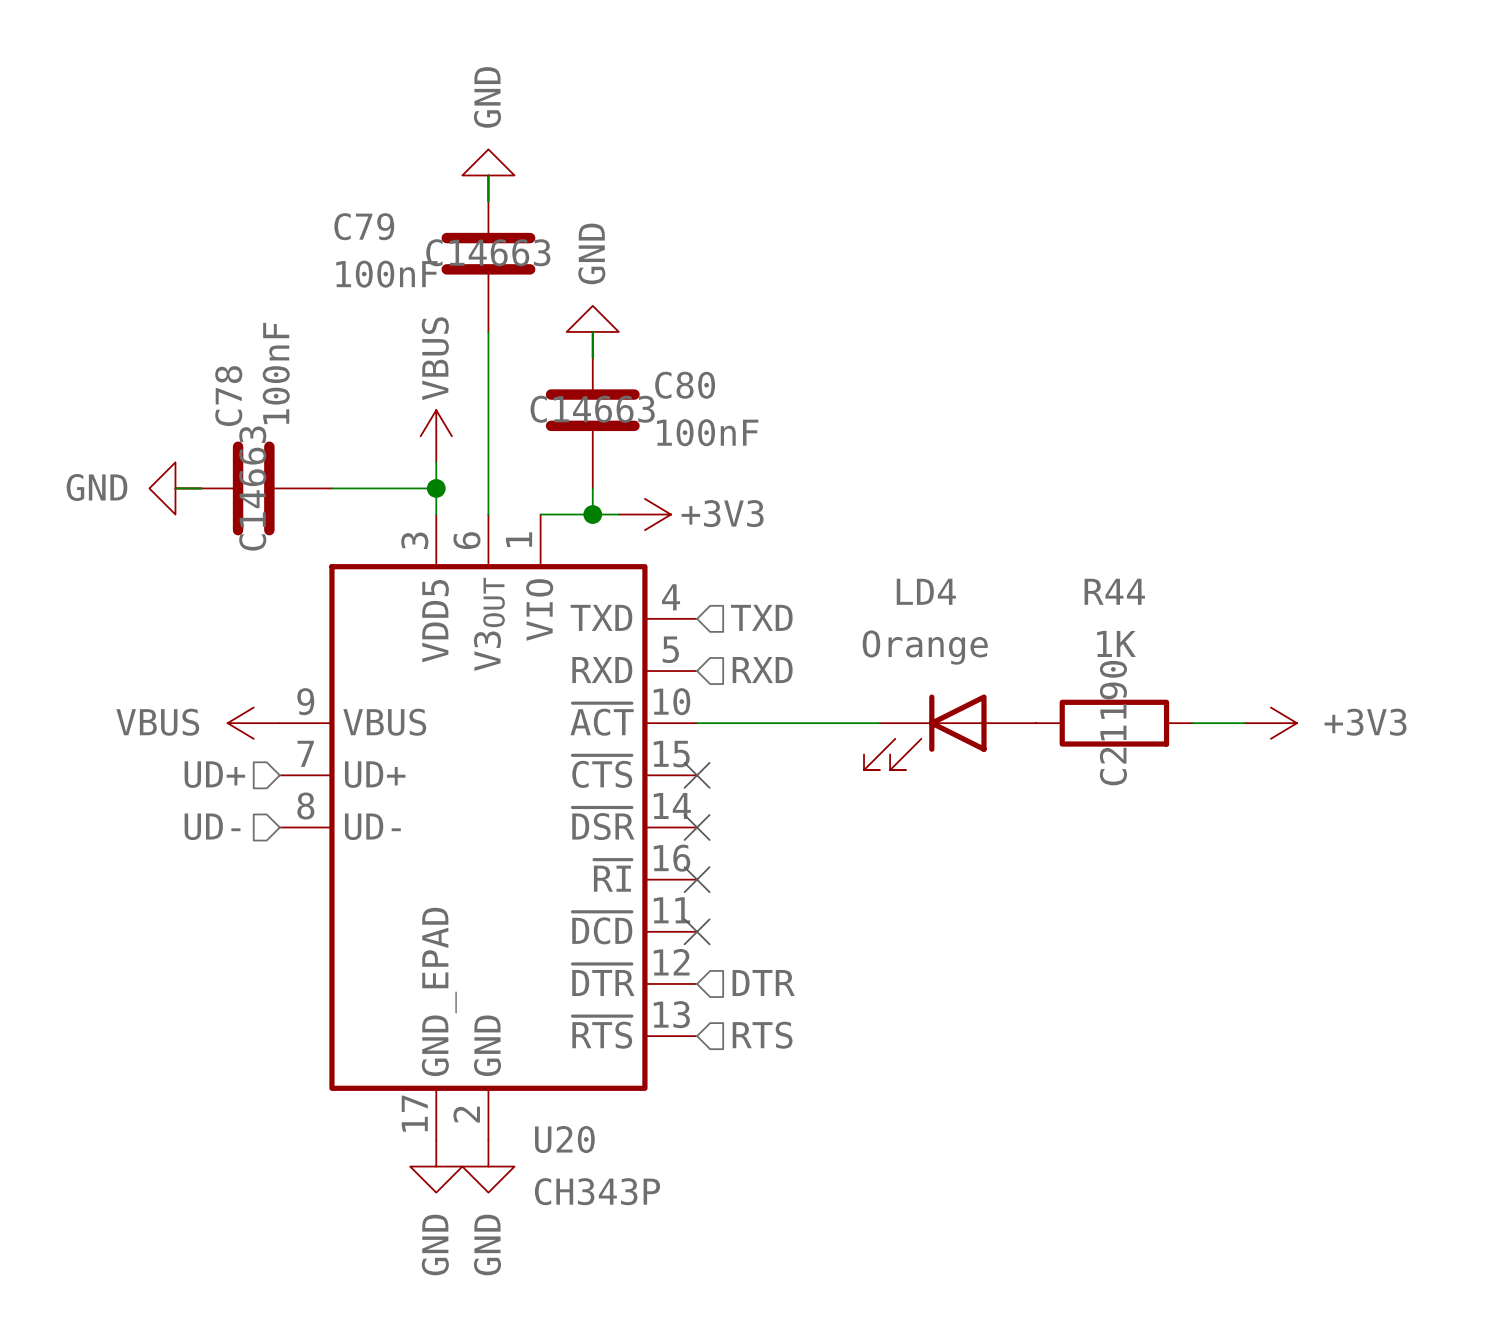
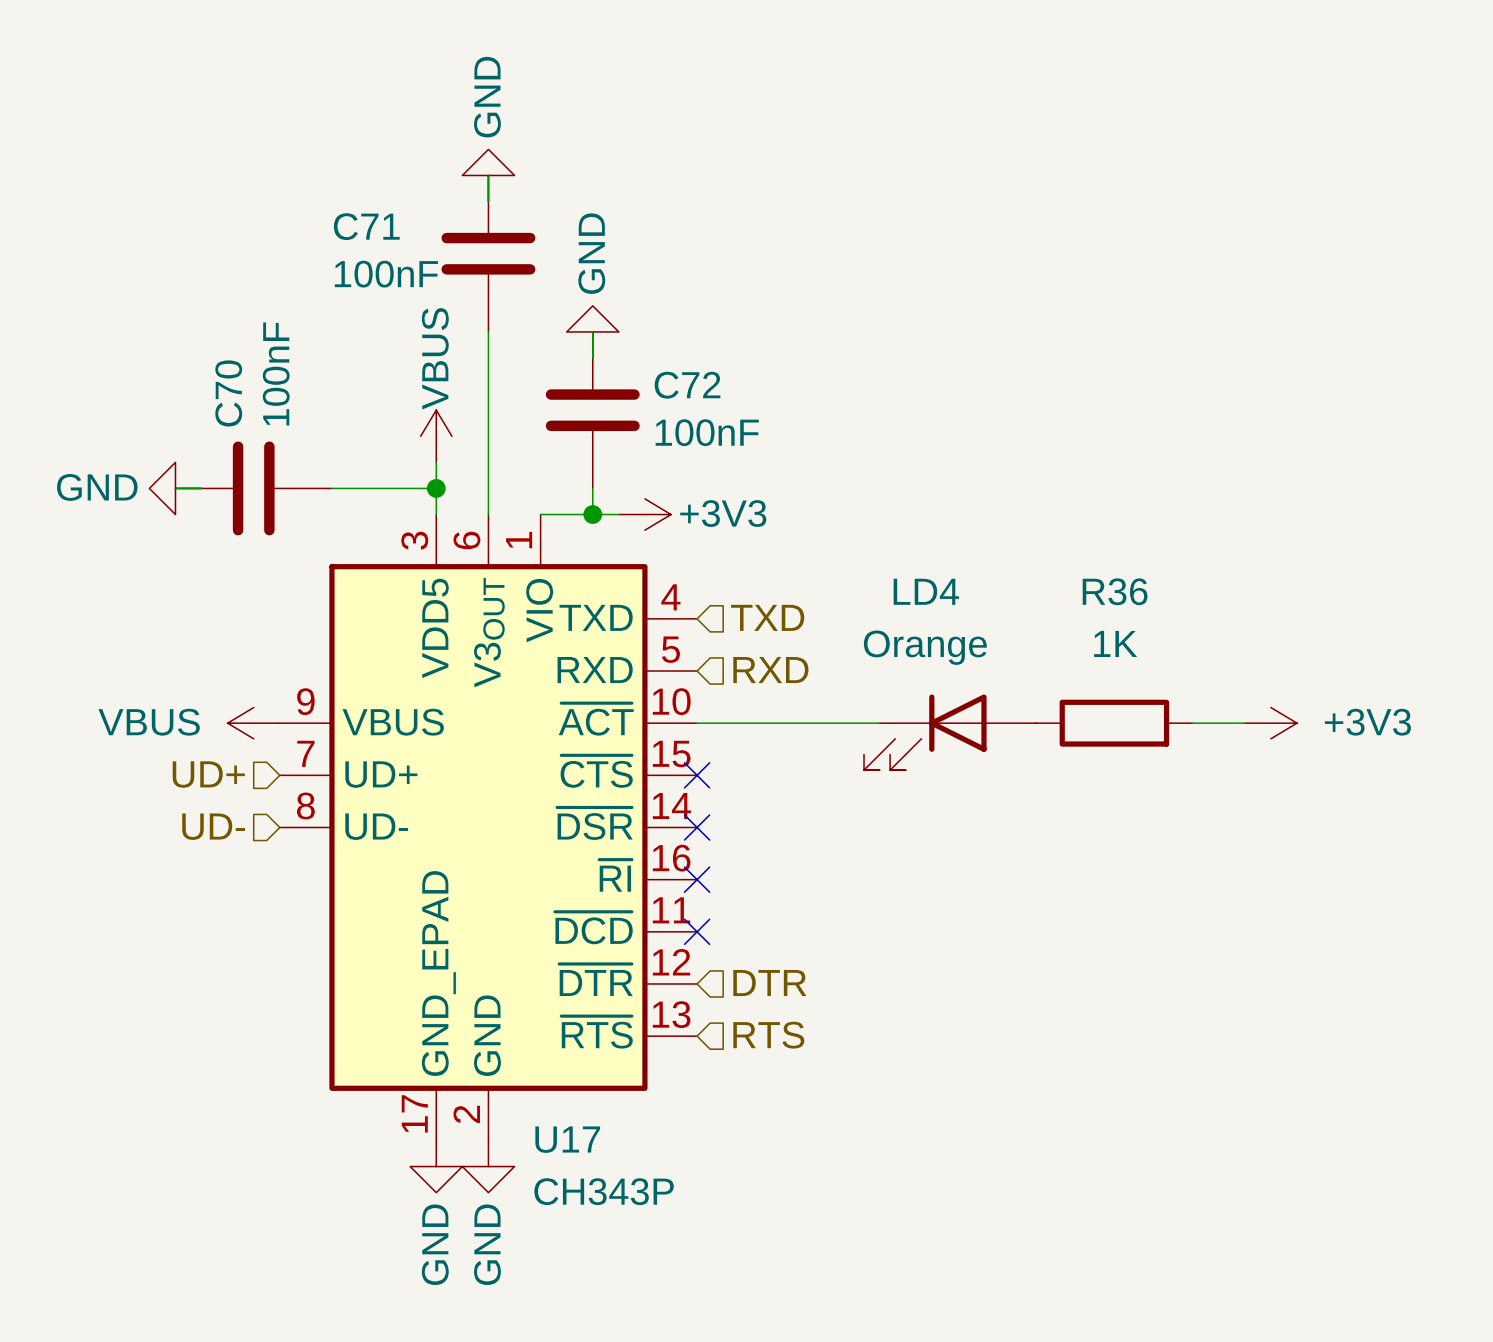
C79 name: C79 (364, 226) -> C71 (366, 226)
C79 text: C14663 (488, 252) -> none
C80 name: C80 (685, 385) -> C72 (687, 385)
C78 name: C78 (228, 396) -> C70 (228, 393)
C80 text: C14663 (592, 409) -> none
C78 text: C14663 (252, 488) -> none
R44 name: R44 (1114, 591) -> R36 (1115, 591)
R44 text: C21190 (1113, 723) -> none
U20 name: U20 (564, 1139) -> U17 (567, 1139)

